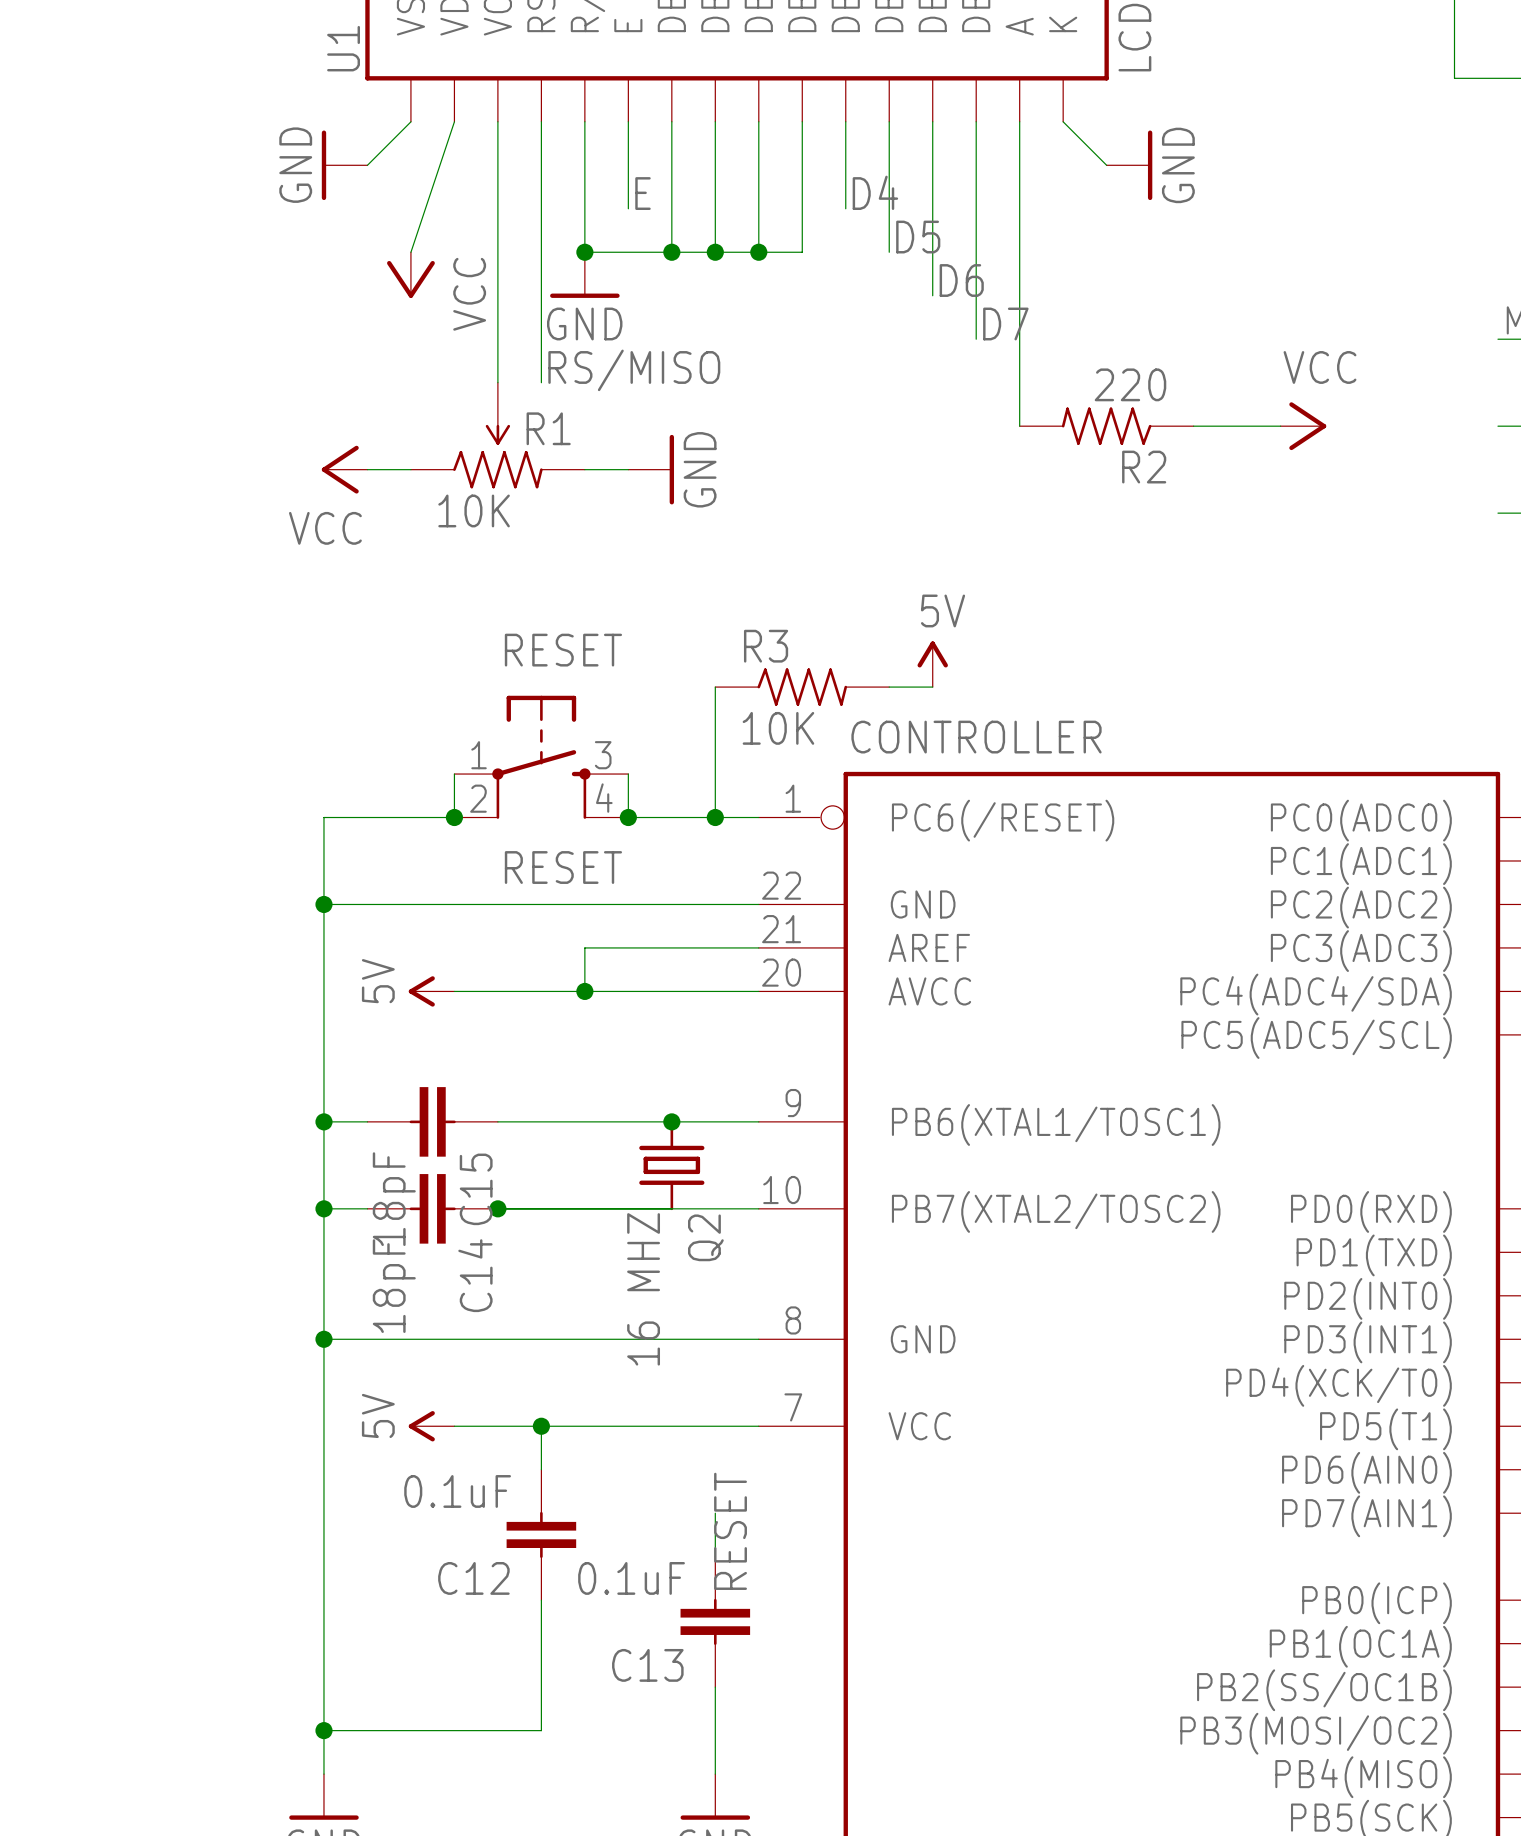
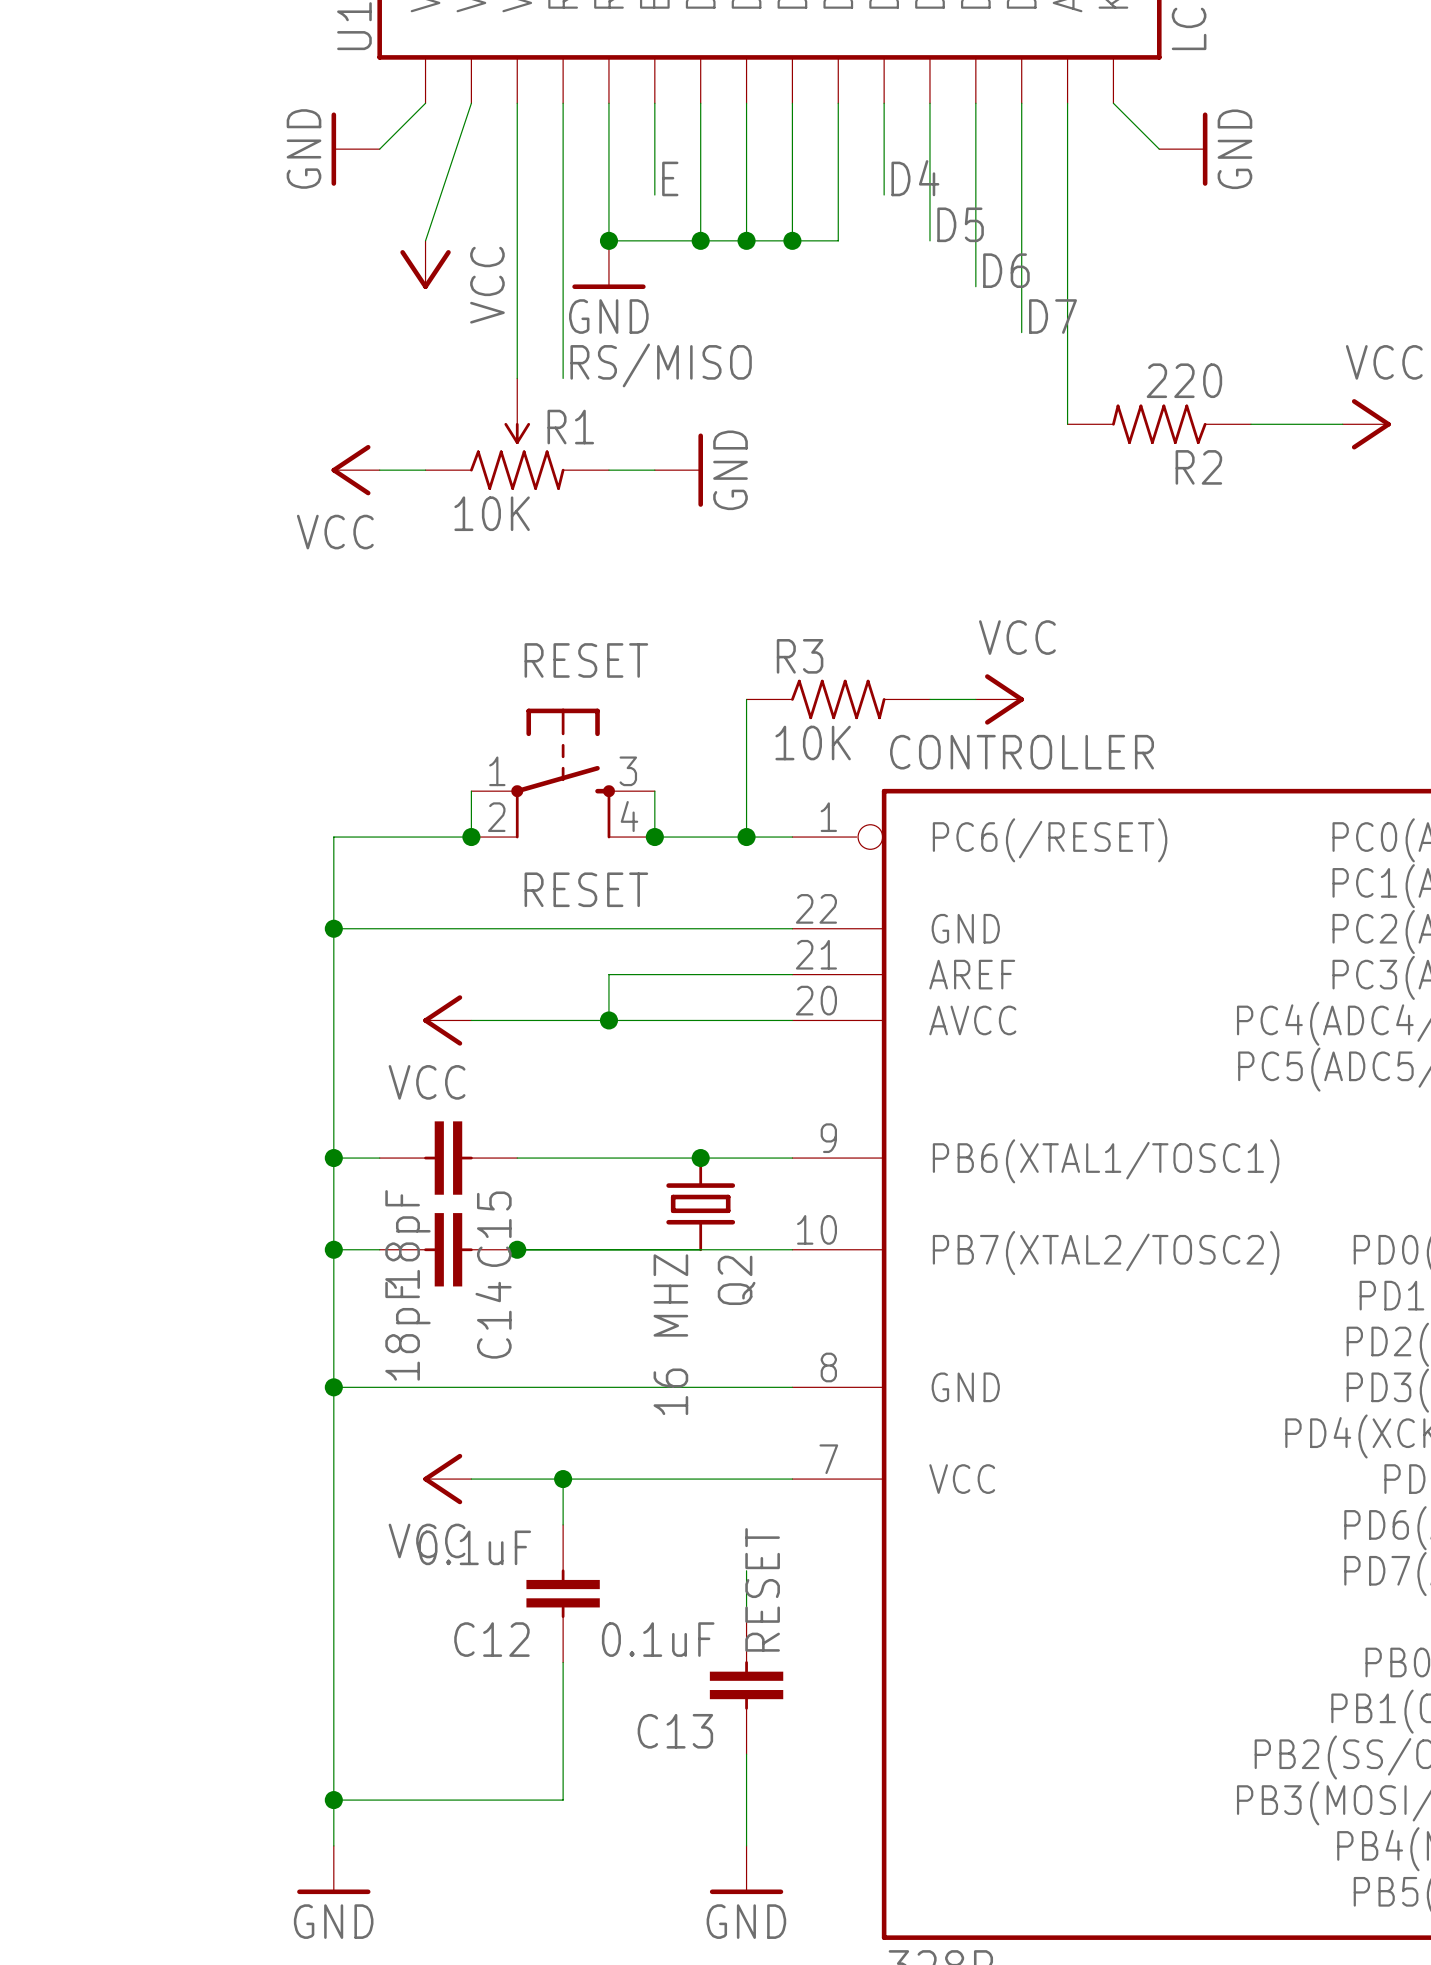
power symbol: 5V (932, 664) -> none
power symbol: none -> VCC (999, 699)
power symbol: 5V (431, 991) -> VCC (447, 1020)
power symbol: 5V (431, 1426) -> VCC (447, 1479)

